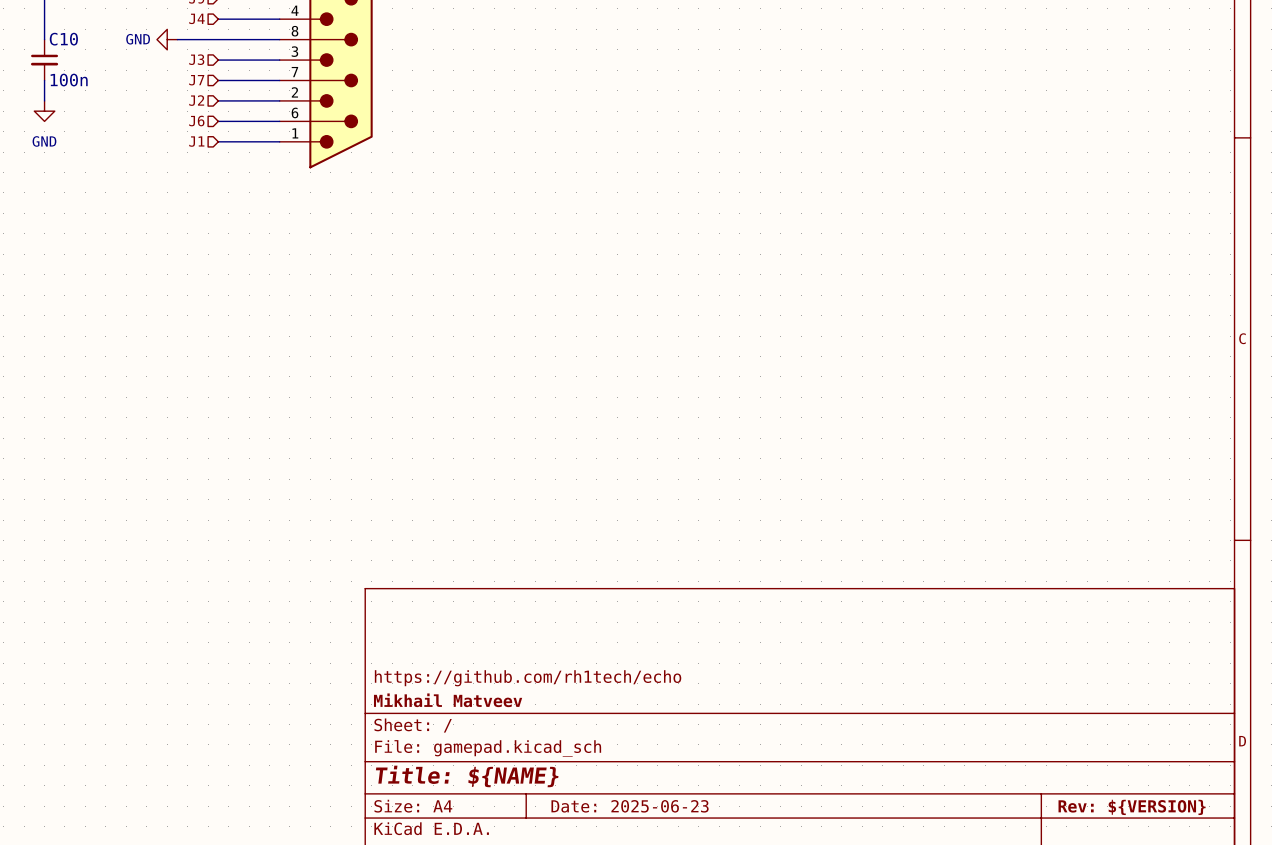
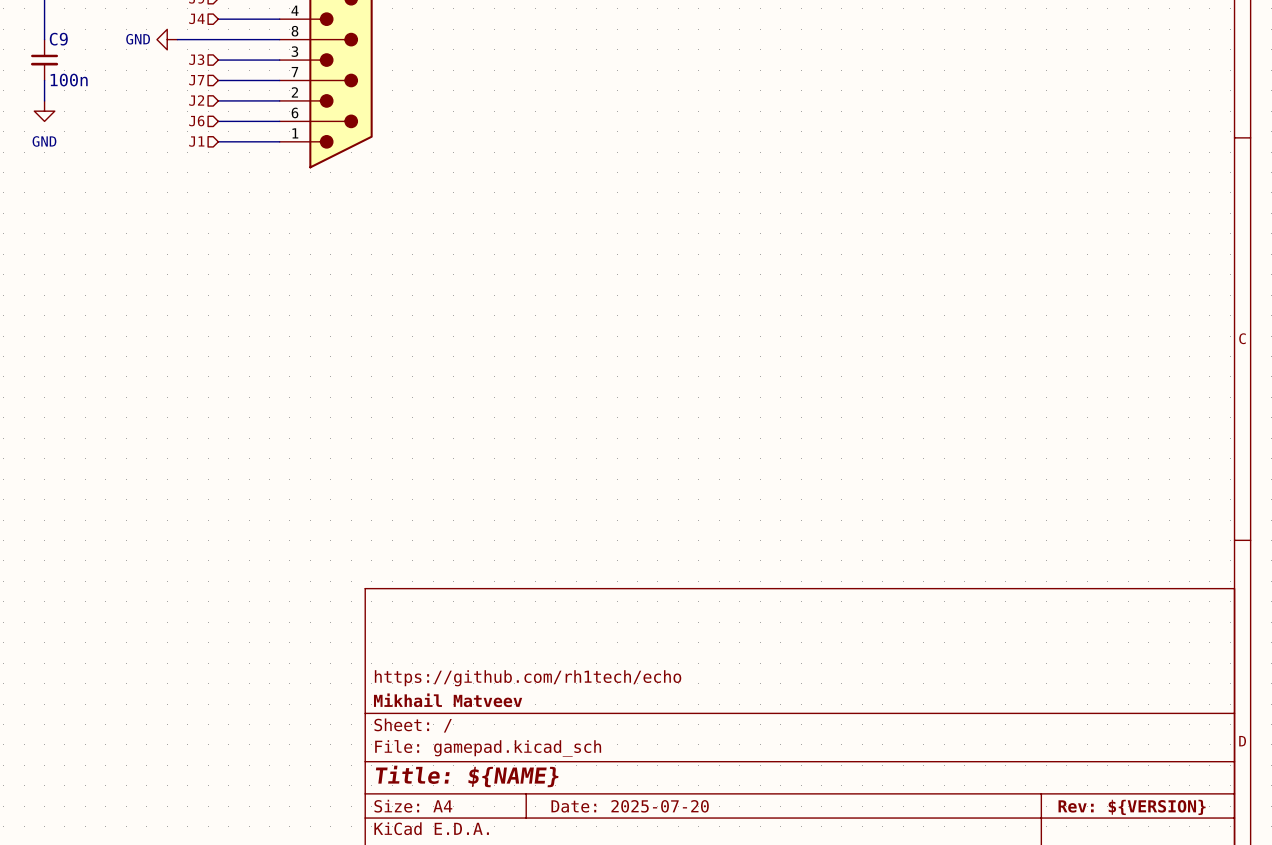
C10 name: C10 (63, 39) -> C9 (58, 39)
title block: Date: 2025-06-23 (630, 806) -> Date: 2025-07-20 (630, 806)

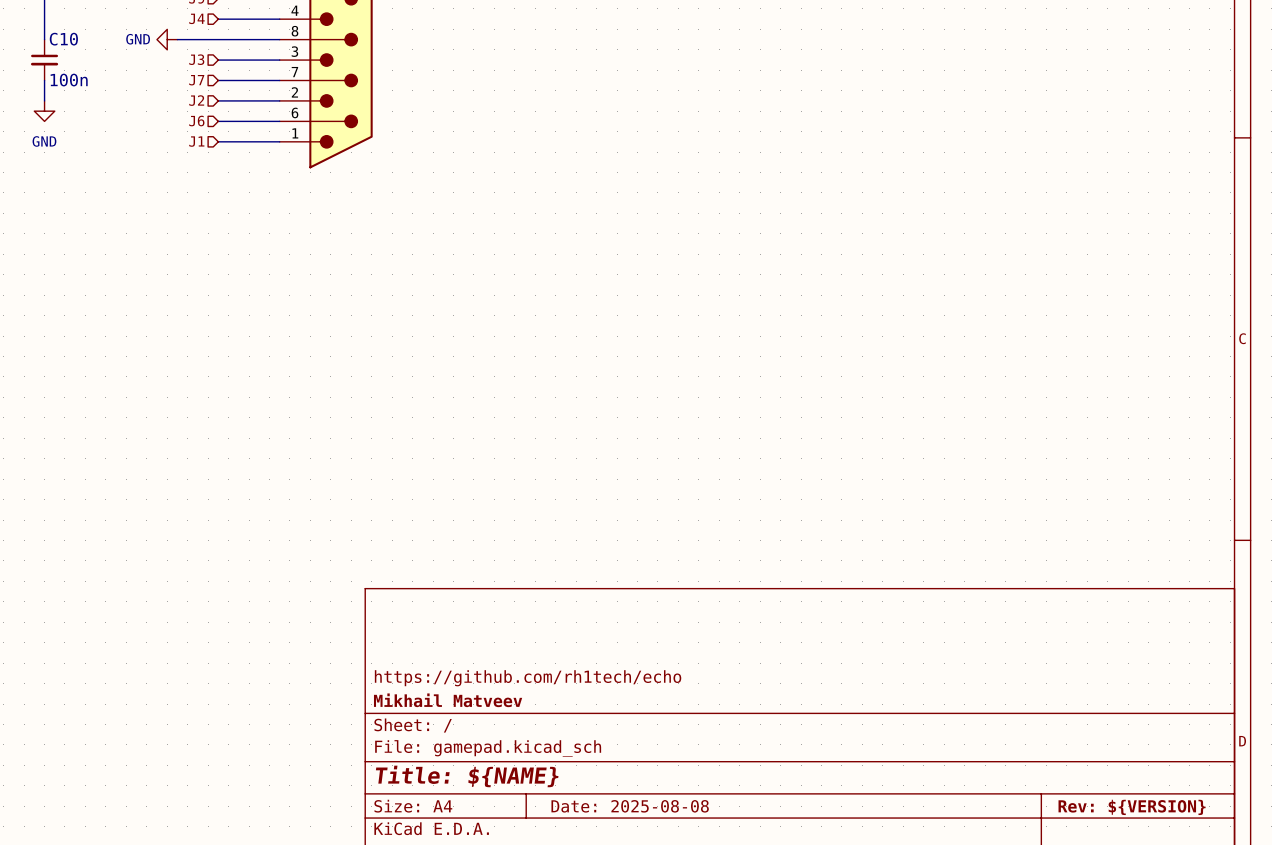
C9 name: C9 (58, 39) -> C10 (63, 39)
title block: Date: 2025-07-20 (630, 806) -> Date: 2025-08-08 (630, 806)

